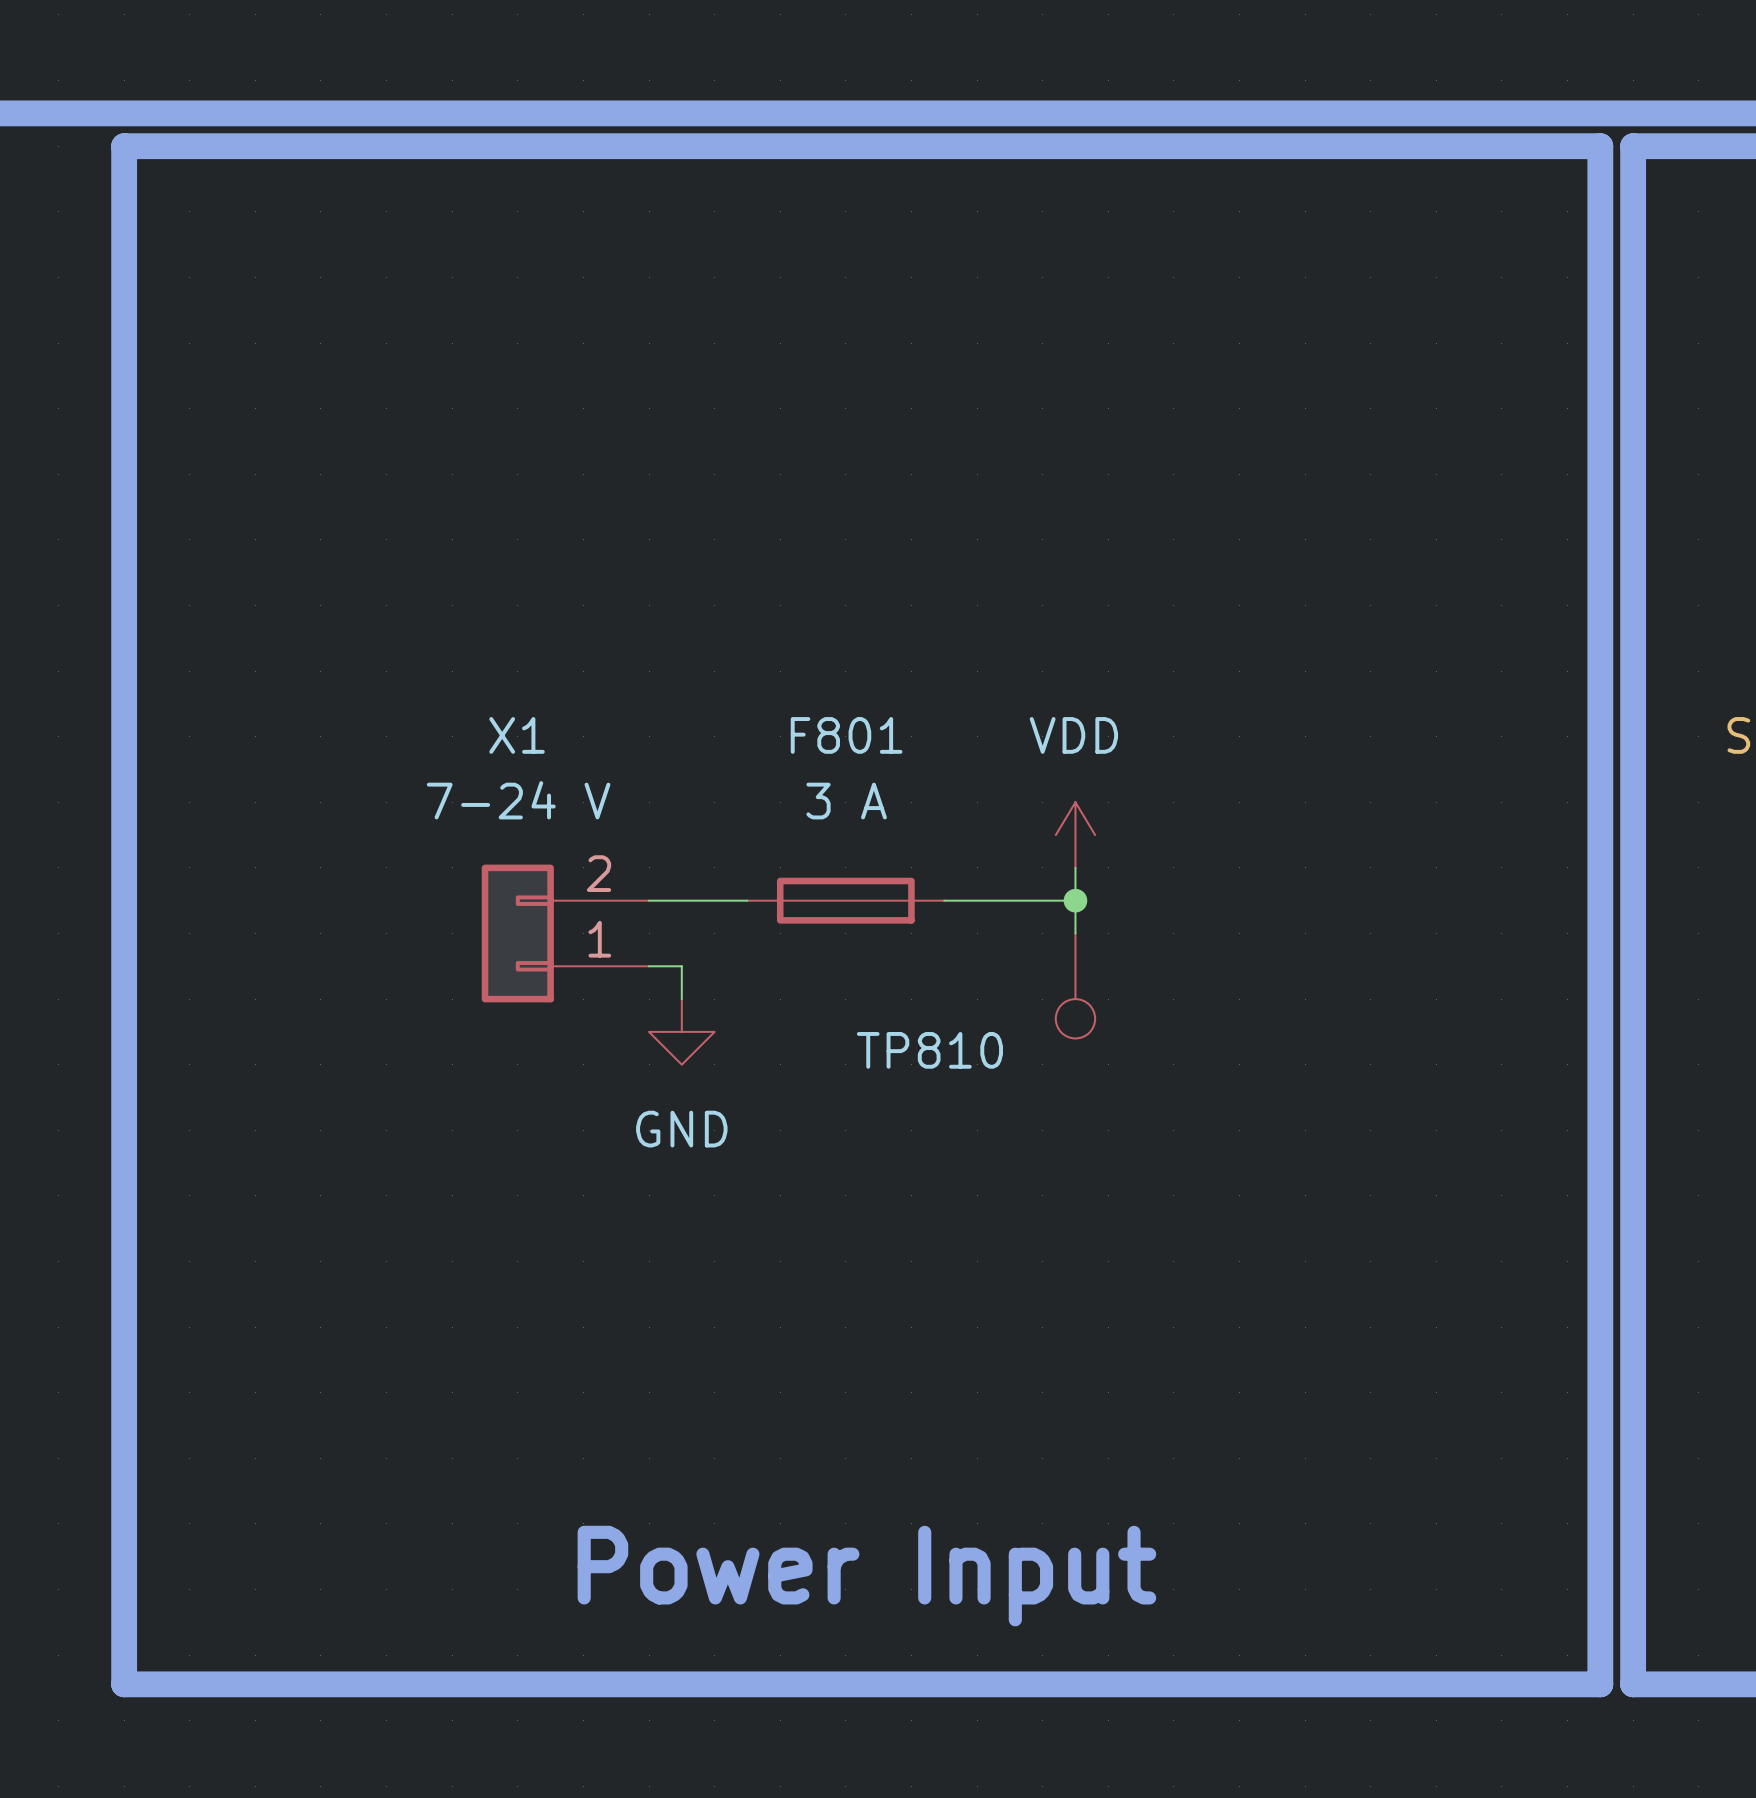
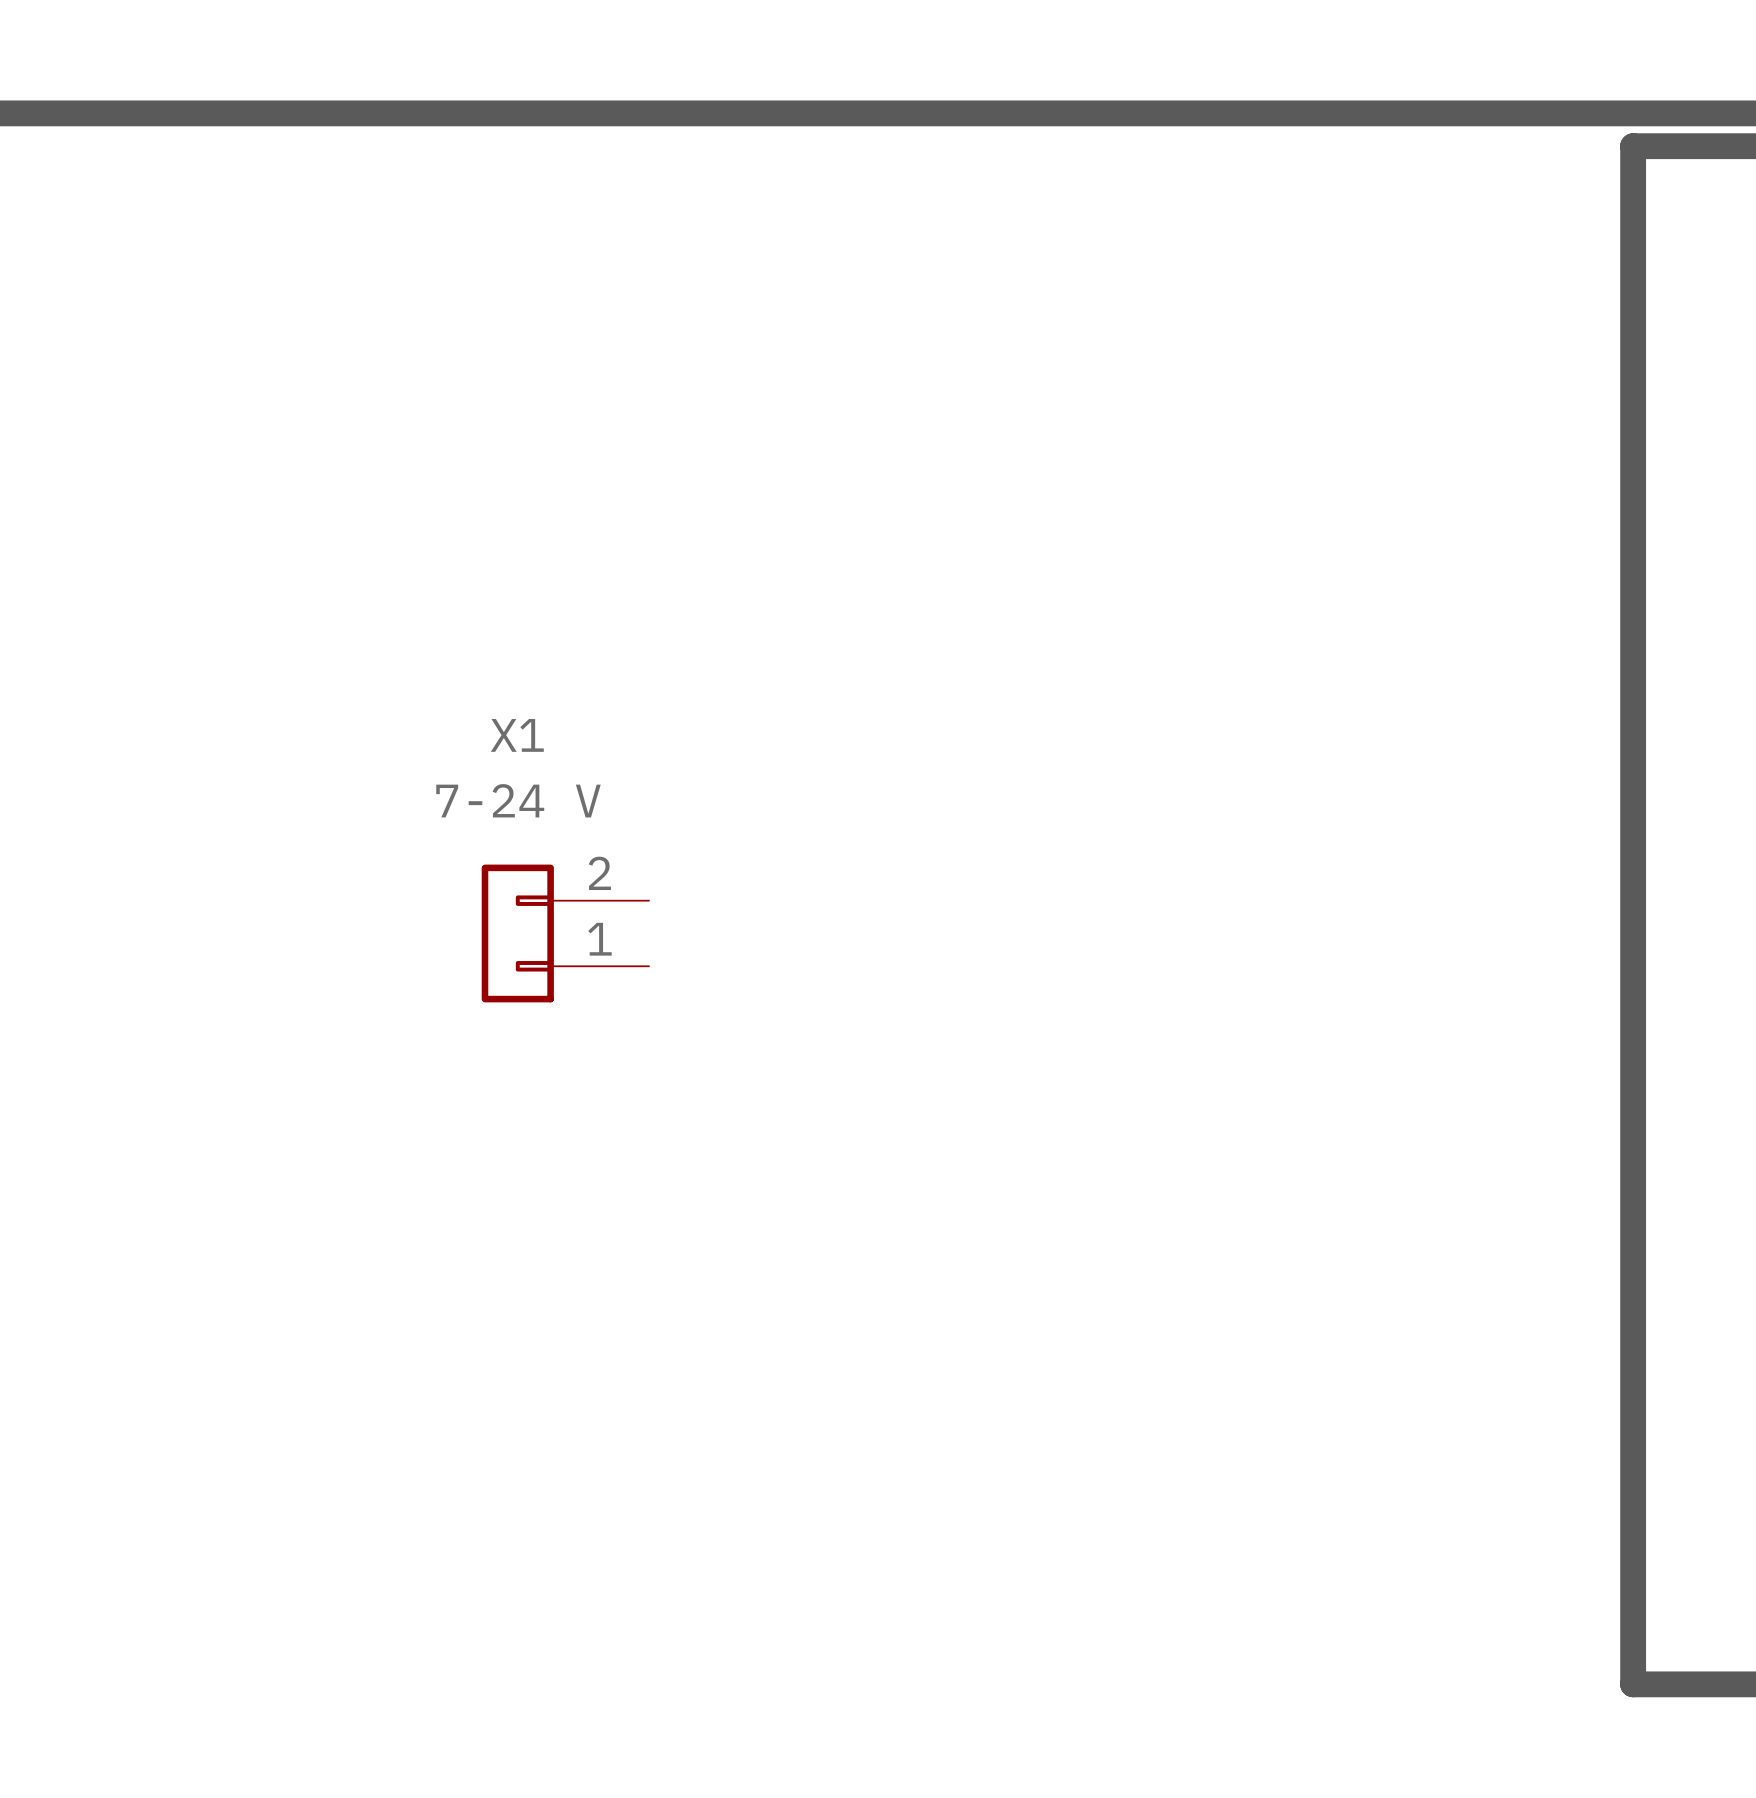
line: (124, 146) (1600, 146) (1600, 1684) (124, 1684) (124, 146) -> none
power symbol: VDD (1075, 835) -> none
wire: (1075, 867) (1075, 933) -> none
wire: (649, 900) (747, 900) -> none
F801: 3 A (845, 900) -> none
wire: (944, 900) (1075, 900) -> none
junction: (1075, 900) -> none
wire: (649, 966) (681, 966) (681, 999) -> none
TP810: (1075, 985) -> none
power symbol: GND (681, 1031) -> none
text: Power Input (866, 1576) -> none

